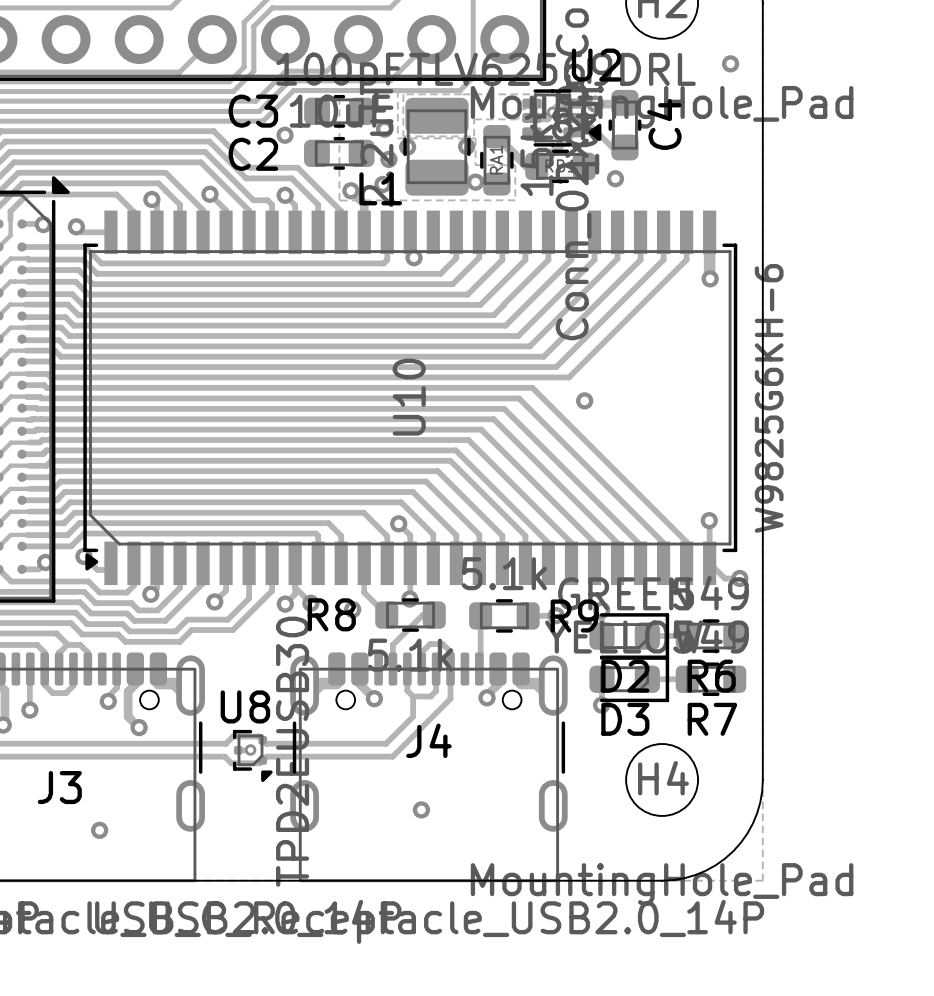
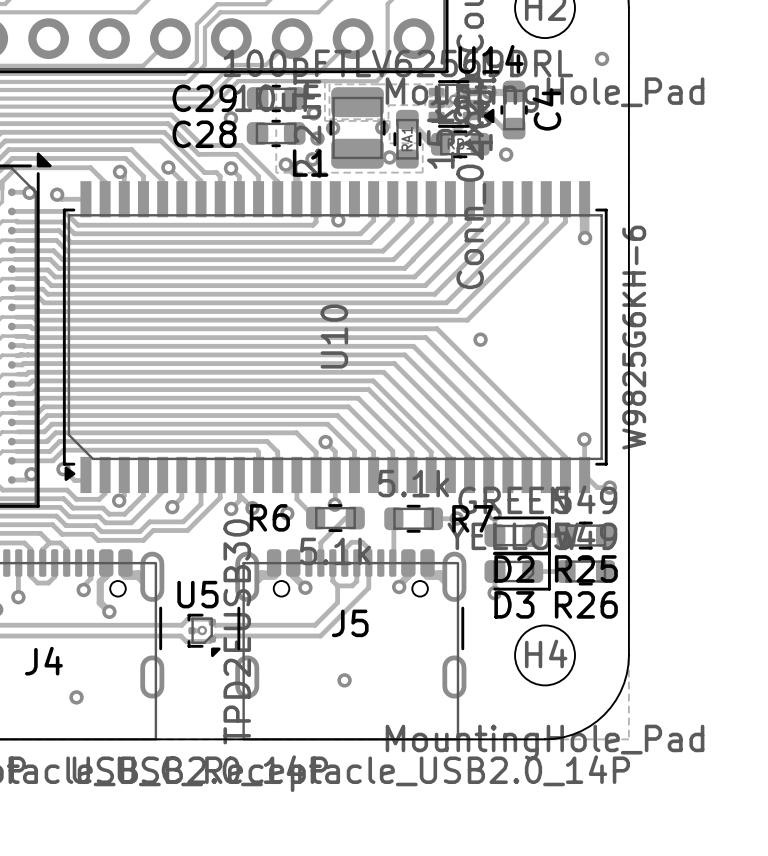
U2 name: U2 (596, 65) -> U14 (491, 59)
C3 name: C3 (253, 111) -> C29 (204, 98)
C2 name: C2 (253, 154) -> C28 (204, 134)
R8 name: R8 (331, 614) -> R6 (269, 517)
R9 name: R9 (574, 615) -> R7 (472, 518)
R6 name: R6 (711, 676) -> R25 (586, 568)
U8 name: U8 (245, 706) -> U5 (197, 594)
R7 name: R7 (712, 719) -> R26 (586, 604)
J4 name: J4 (428, 740) -> J5 (350, 623)
J3 name: J3 (59, 787) -> J4 (43, 661)

